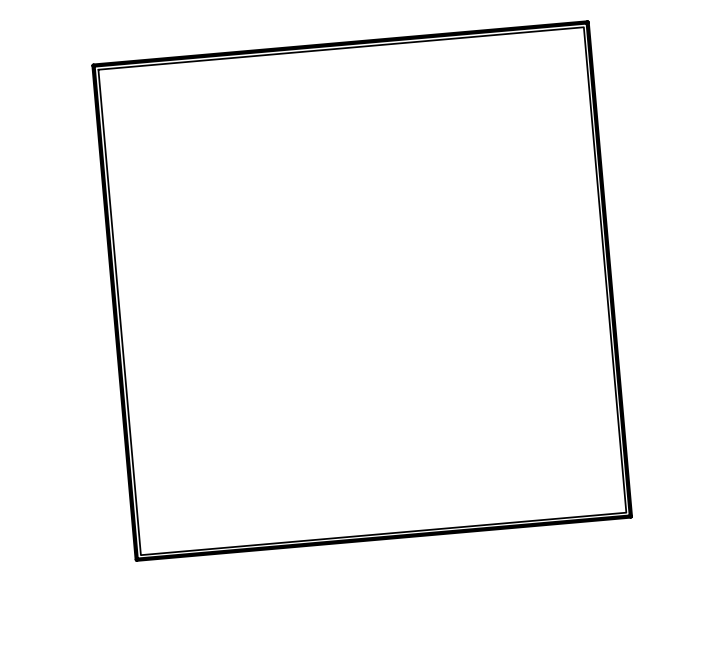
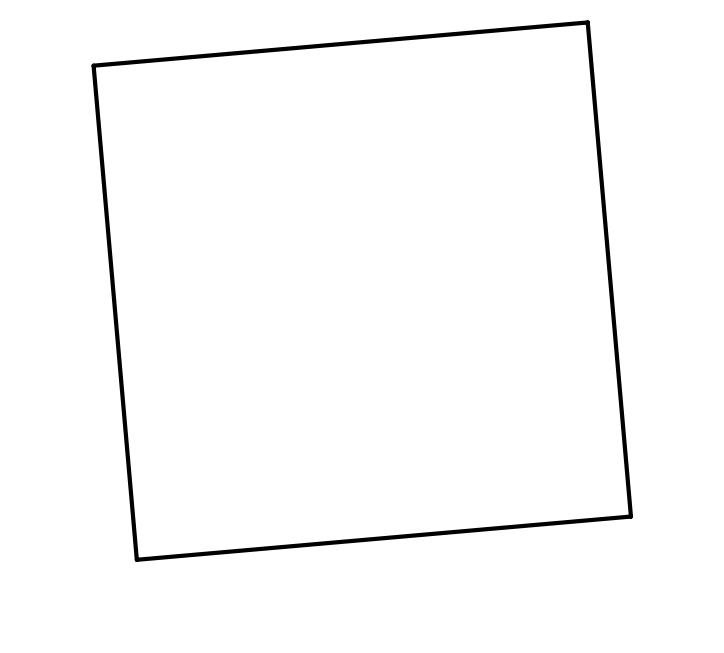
drawing shape: [91, 20, 633, 562] -> [91, 20, 634, 562]

